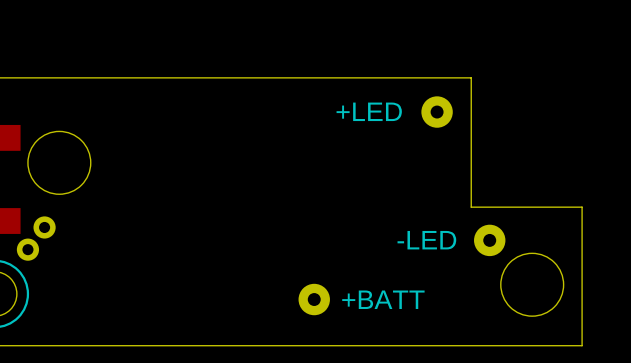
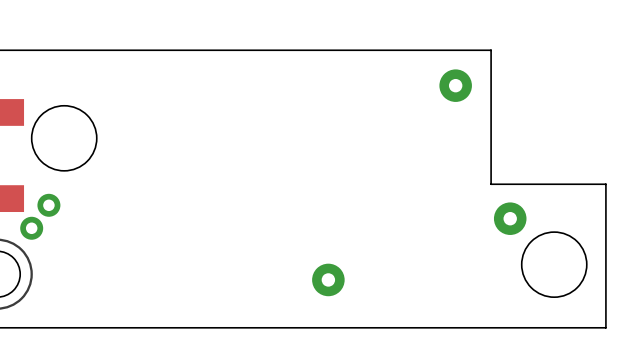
text: +LED (369, 111) -> none
text: -LED (426, 240) -> none
text: +BATT (383, 299) -> none

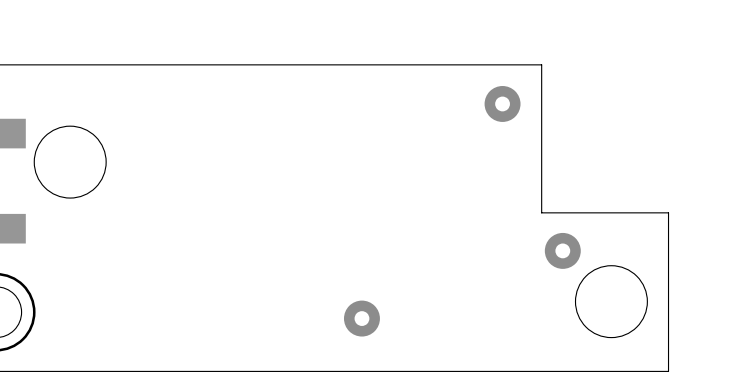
part: (48, 205) -> none
part: (31, 228) -> none

